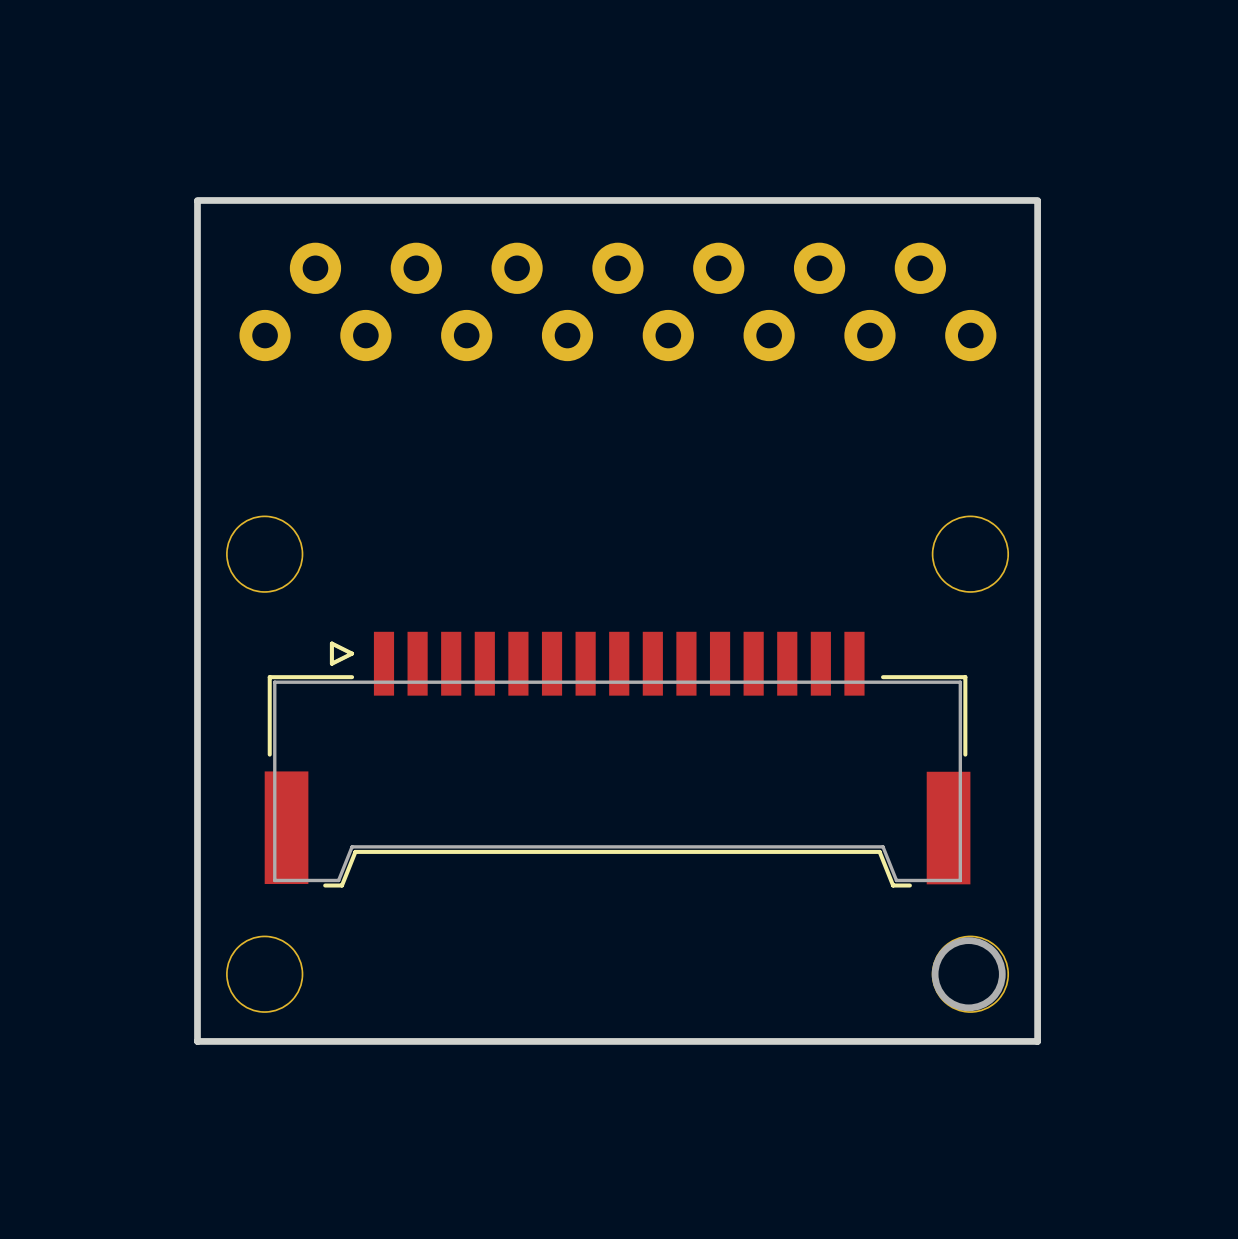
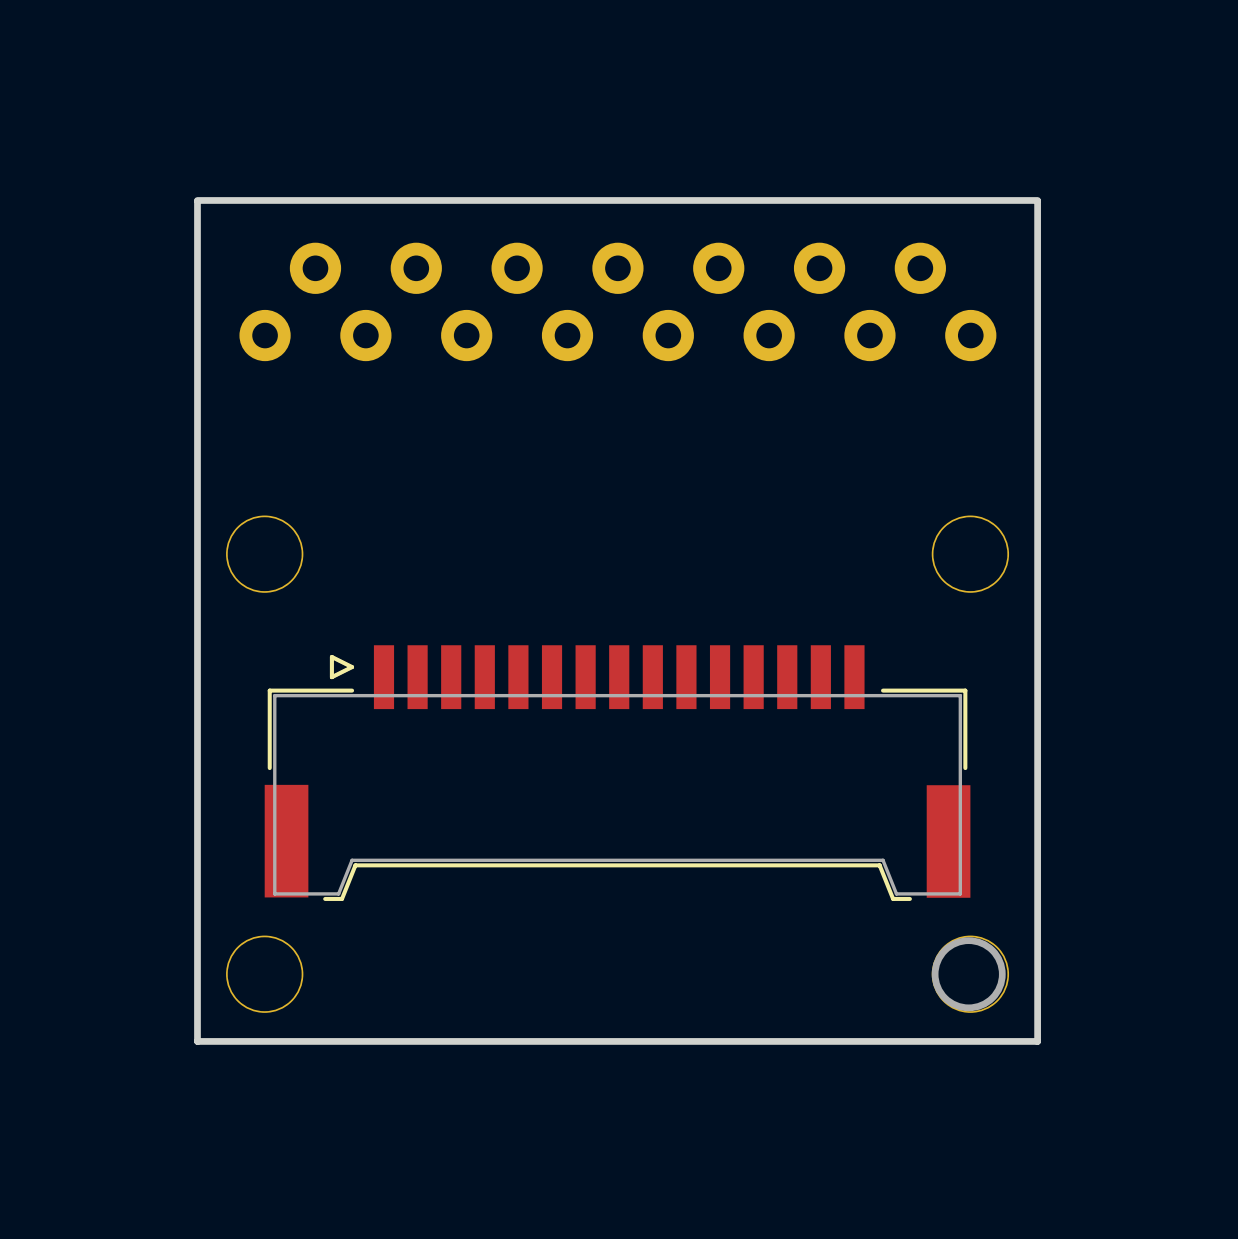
part position: (617, 759) -> (617, 773)

